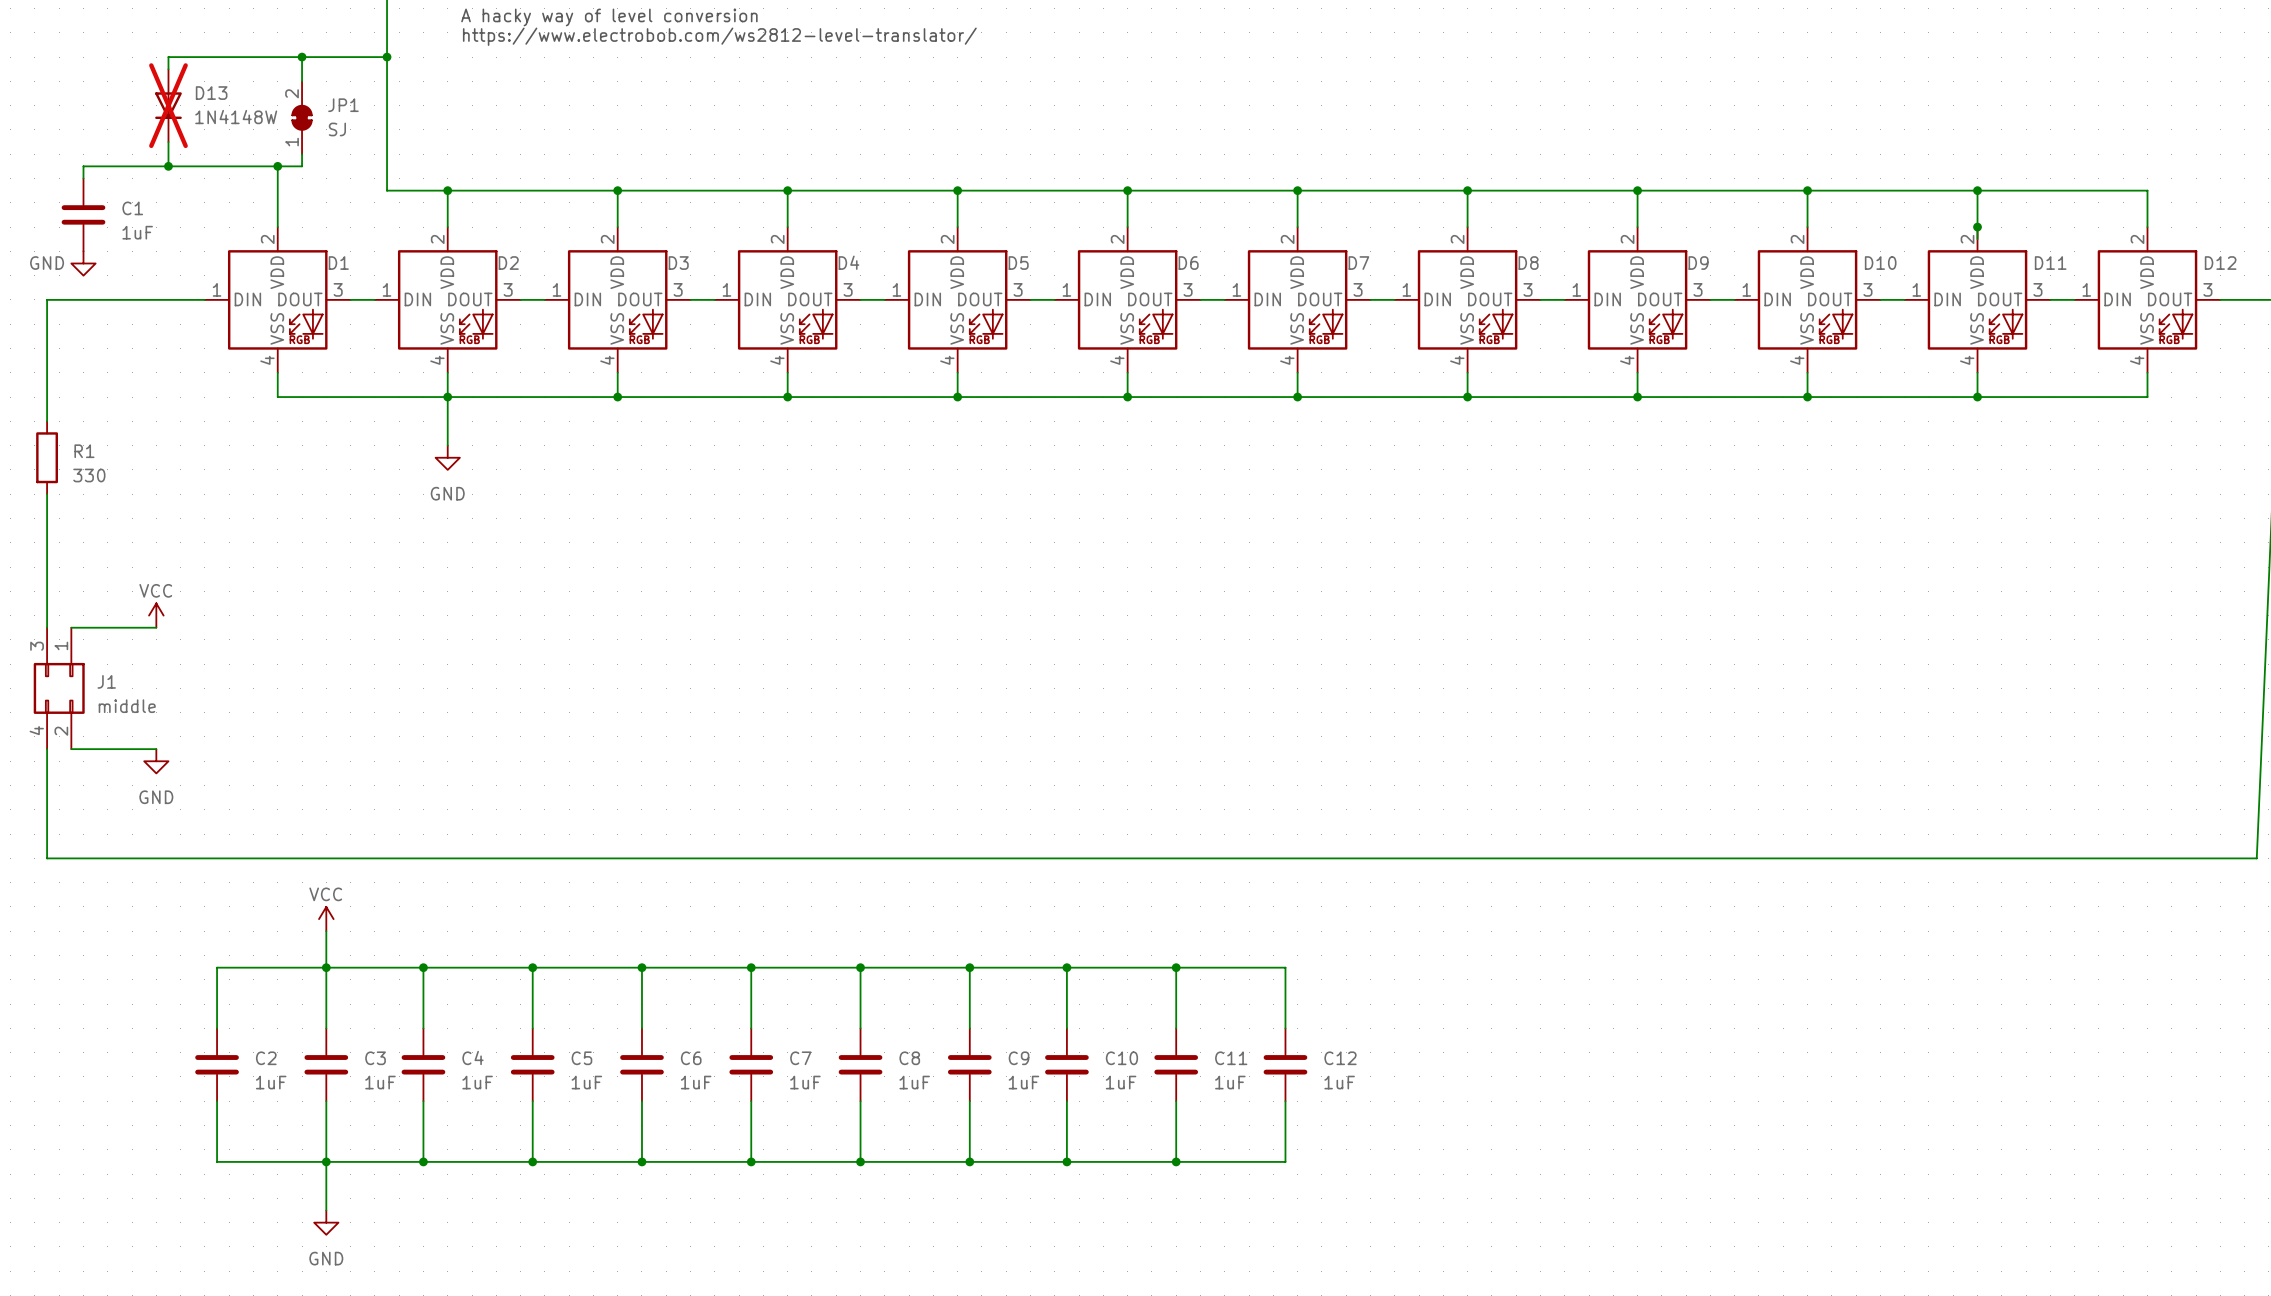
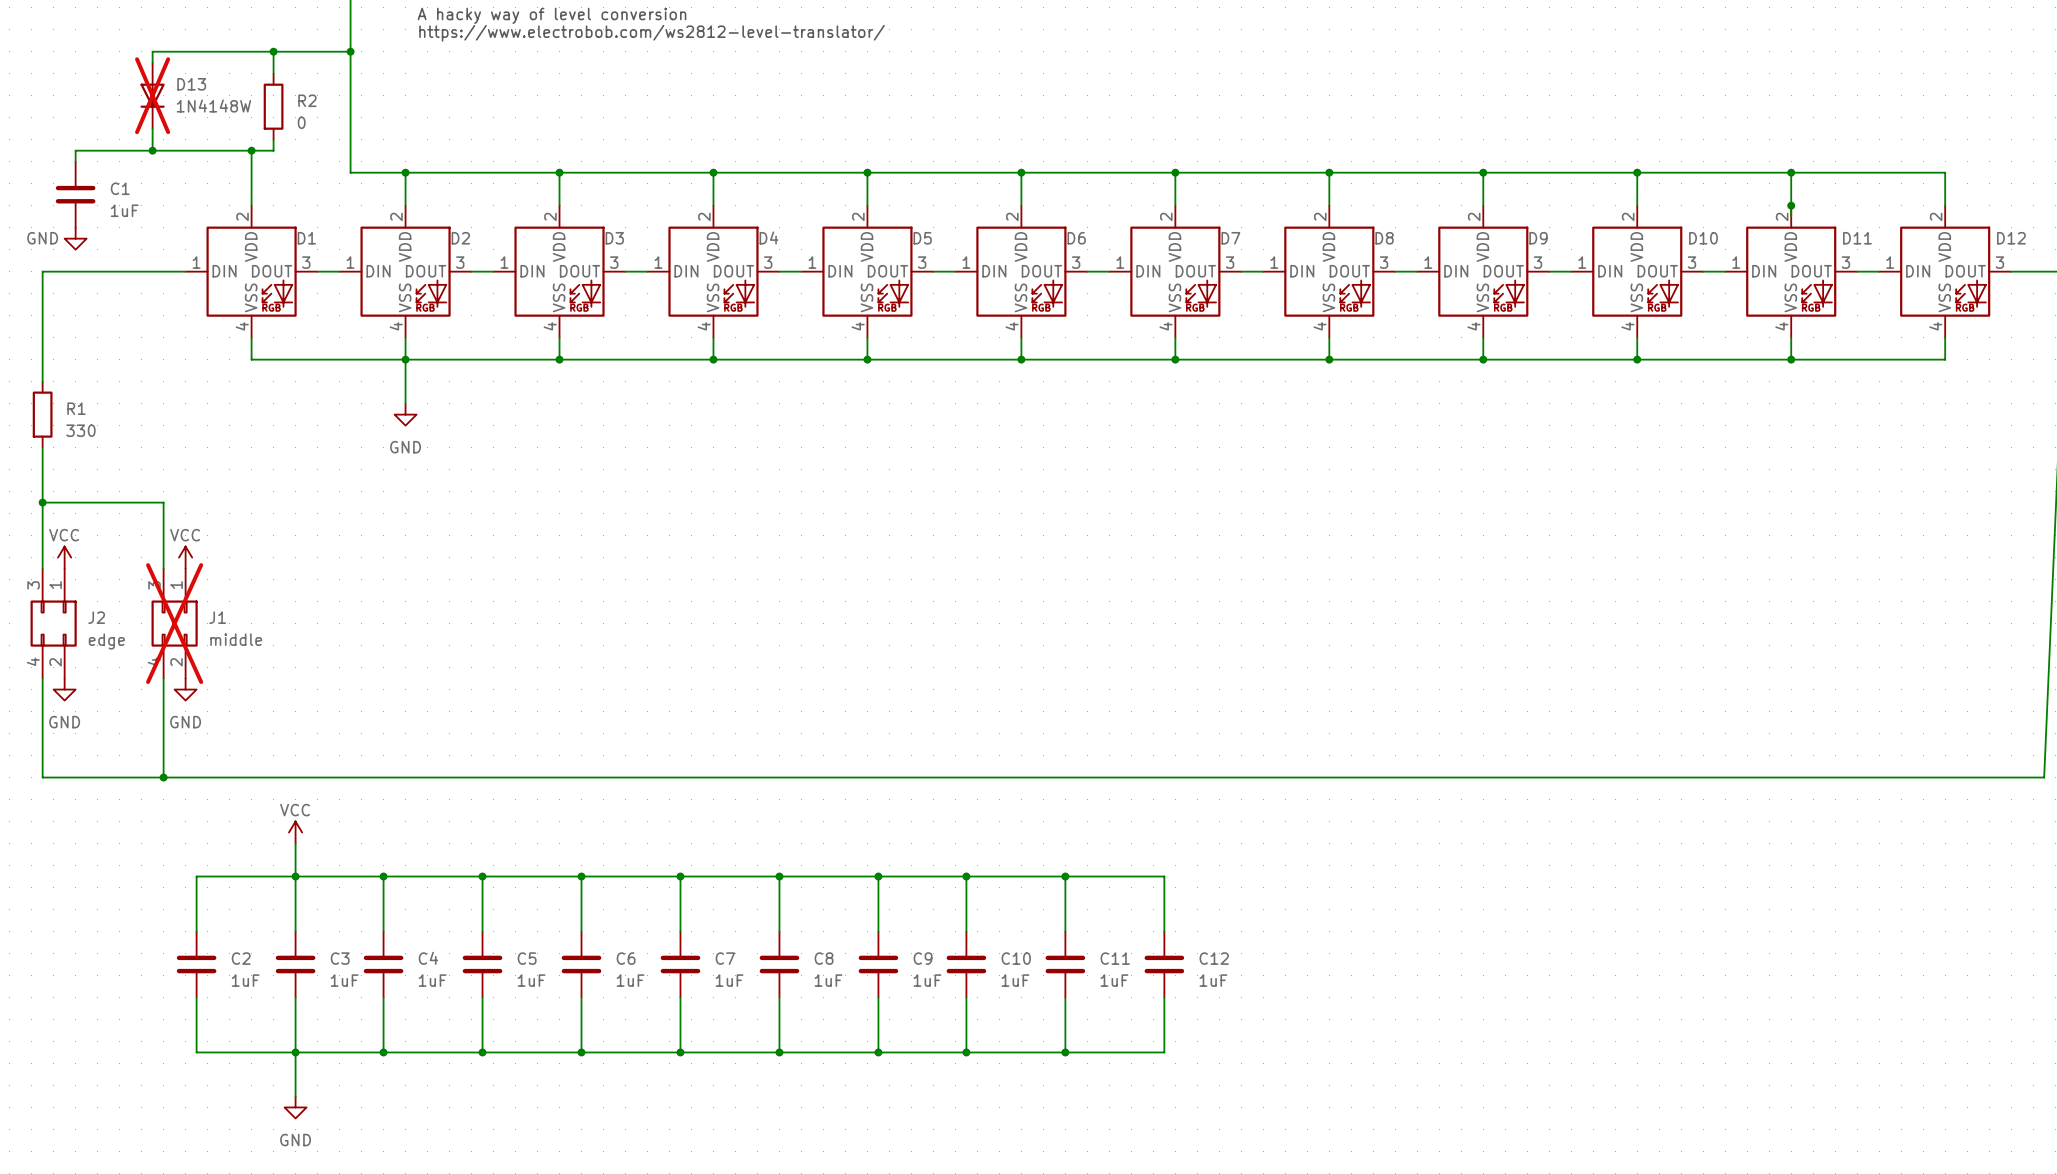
JP1: SJ (302, 117) -> none
R2: none -> 0 (273, 106)
wire: none -> (42, 502) (163, 502) (163, 568)
junction: none -> (42, 502)
power symbol: none -> VCC (64, 557)
power symbol: VCC (156, 615) -> none
power symbol: none -> VCC (185, 557)
wire: (71, 627) (156, 627) -> none
J1 name: J1 (106, 681) -> J2 (96, 617)
J1: none -> middle (174, 623)
J1 value: middle (127, 706) -> edge (106, 641)
wire: (71, 749) (156, 749) -> none
wire: none -> (163, 678) (163, 777)
power symbol: none -> GND (64, 689)
power symbol: GND (156, 761) -> none
power symbol: none -> GND (185, 689)
junction: none -> (163, 777)

